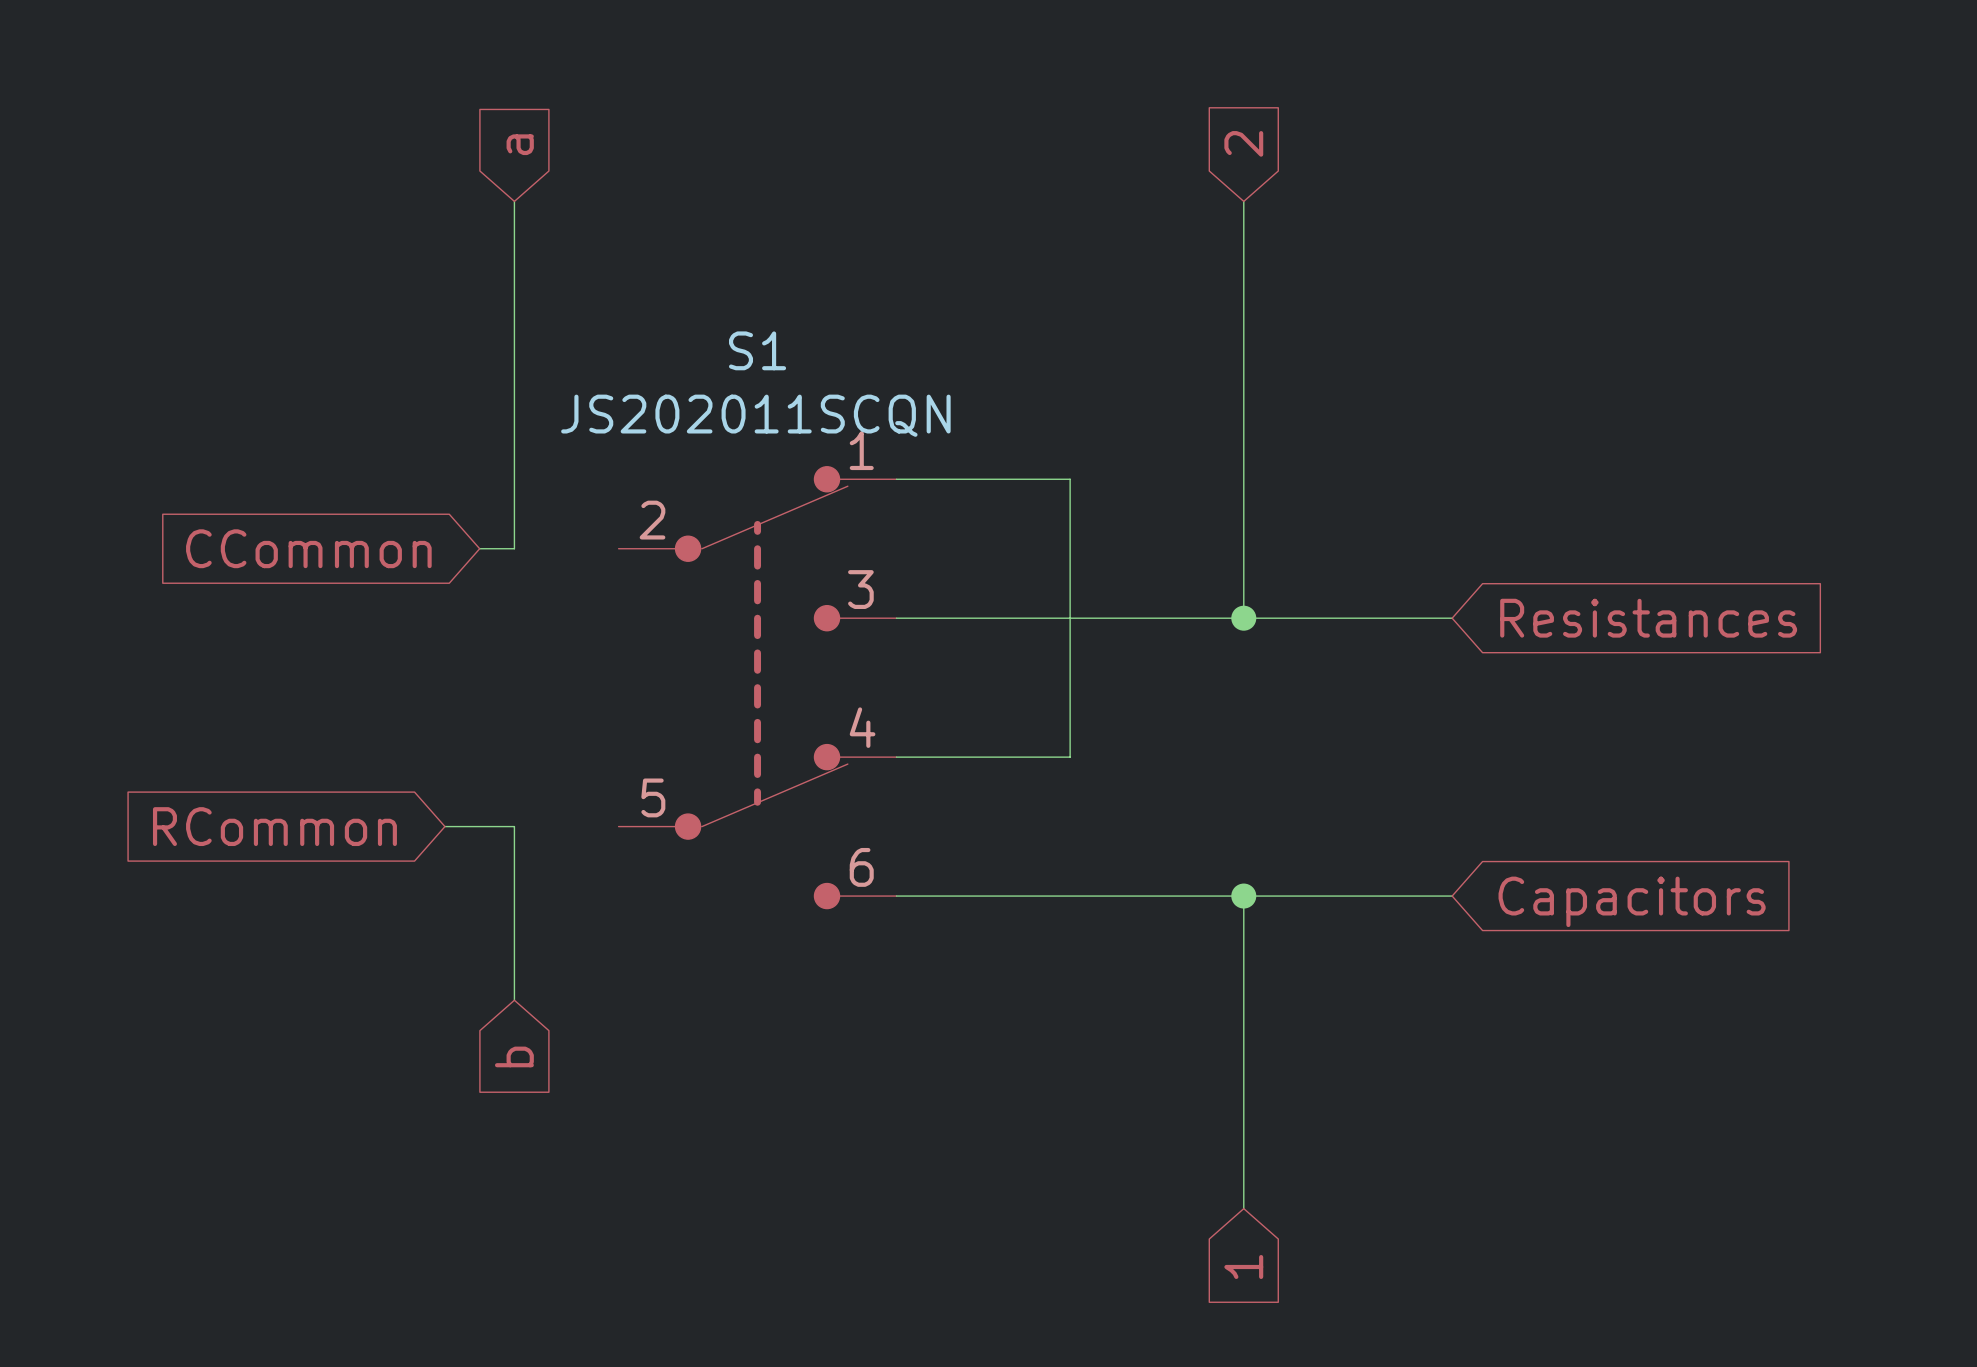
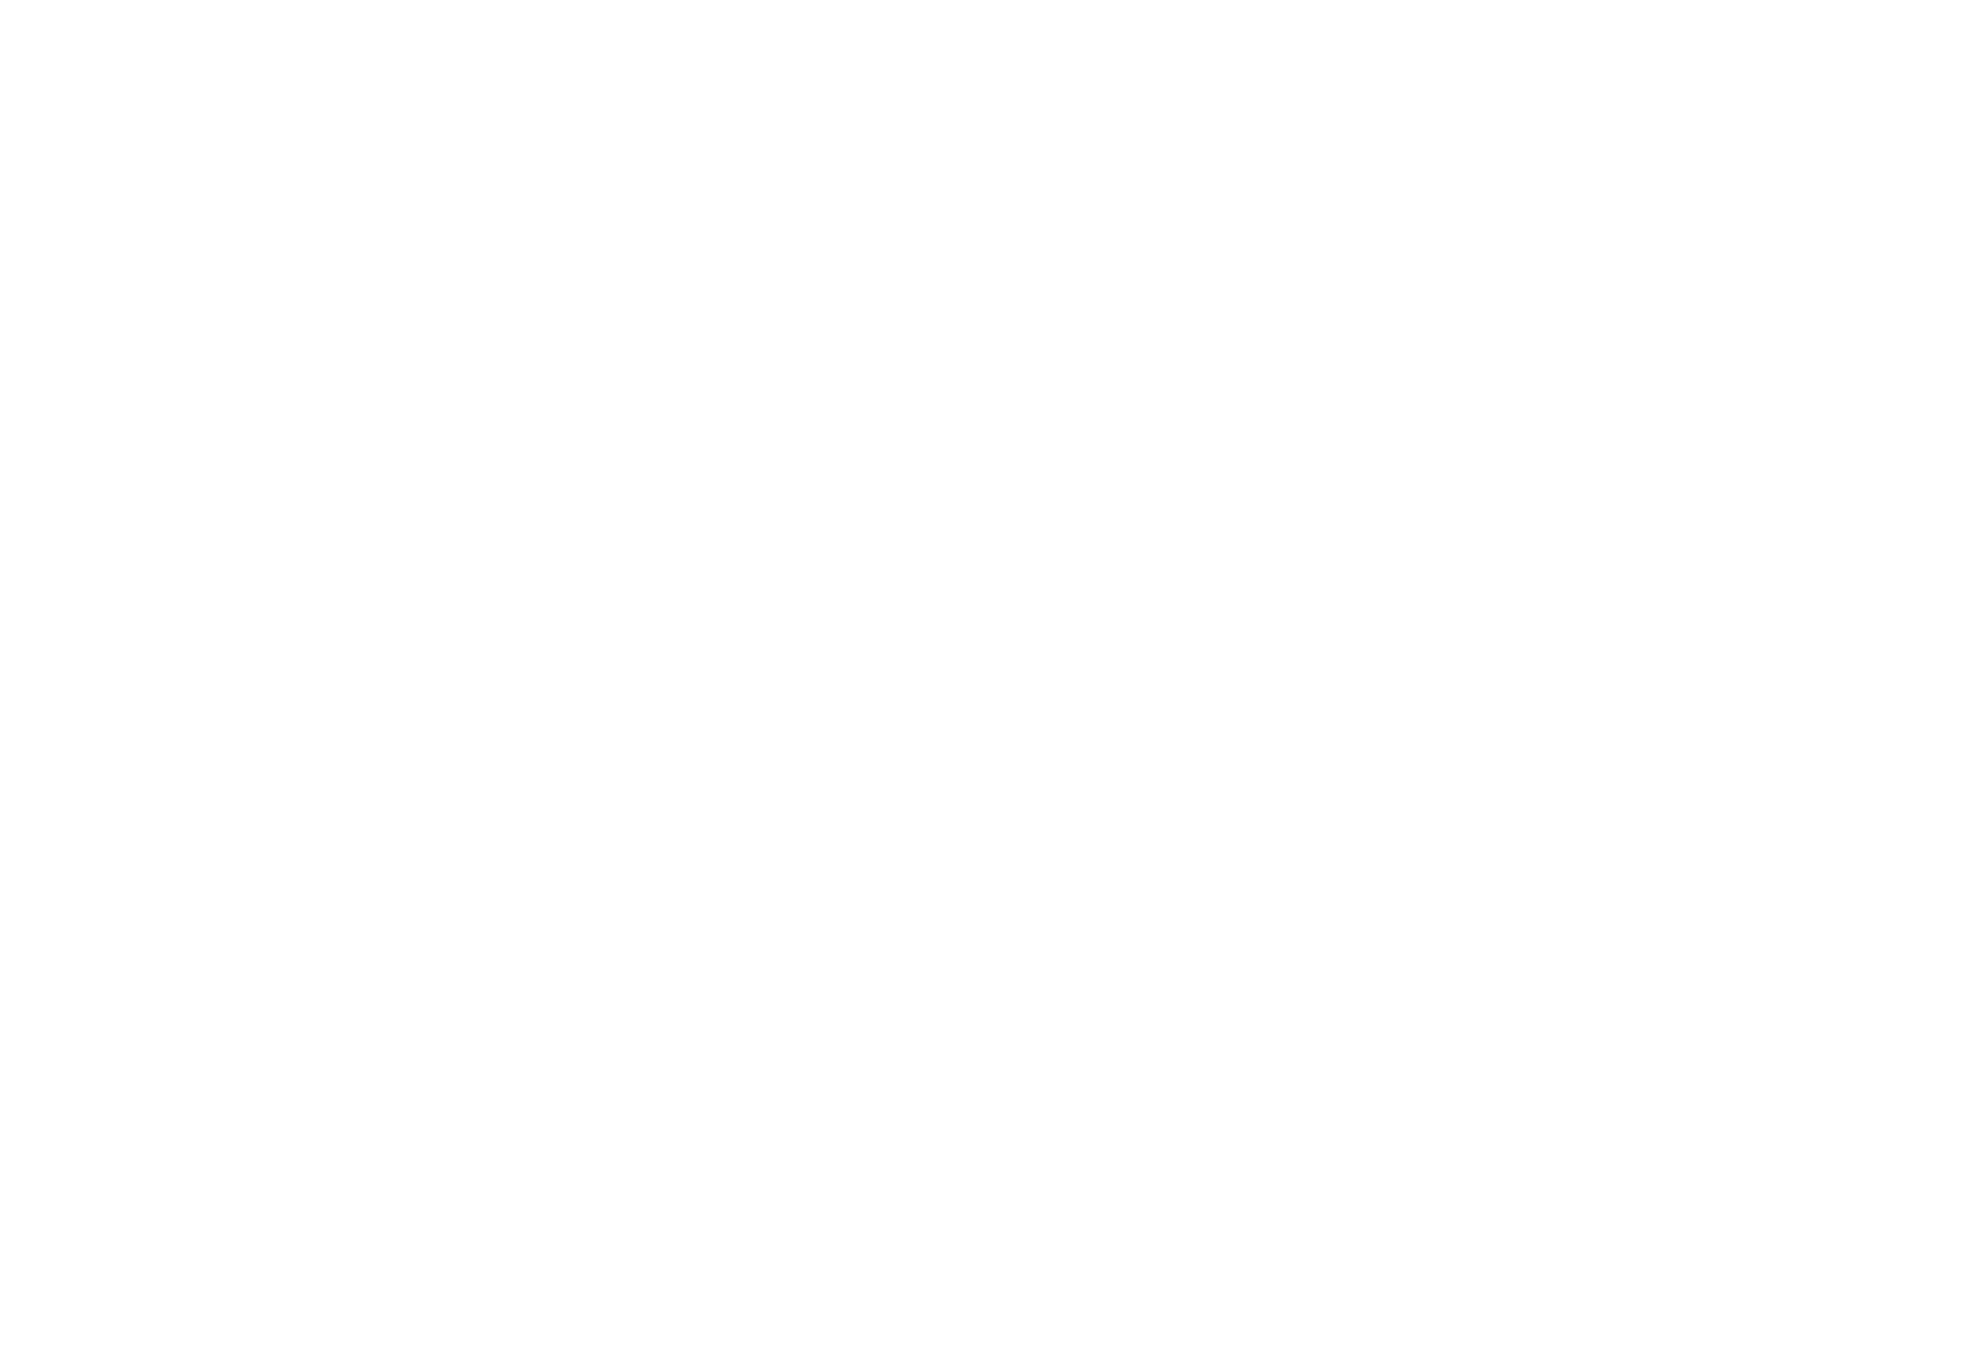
global label: 2 (1243, 143) -> none
global label: a (520, 144) -> none
wire: (514, 201) (514, 548) (479, 548) -> none
wire: (1243, 201) (1243, 618) -> none
wire: (896, 479) (1070, 479) (1070, 757) (896, 757) -> none
global label: CCommon (308, 548) -> none
wire: (896, 618) (1452, 618) -> none
junction: (1243, 618) -> none
global label: Resistances (1648, 618) -> none
S1: JS202011SCQN (757, 687) -> none
global label: RCommon (274, 826) -> none
wire: (444, 826) (514, 826) (514, 1000) -> none
wire: (896, 896) (1452, 896) -> none
wire: (1243, 896) (1243, 1208) -> none
junction: (1243, 896) -> none
global label: Capacitors (1632, 901) -> none
global label: b (514, 1056) -> none
global label: 1 (1243, 1266) -> none

